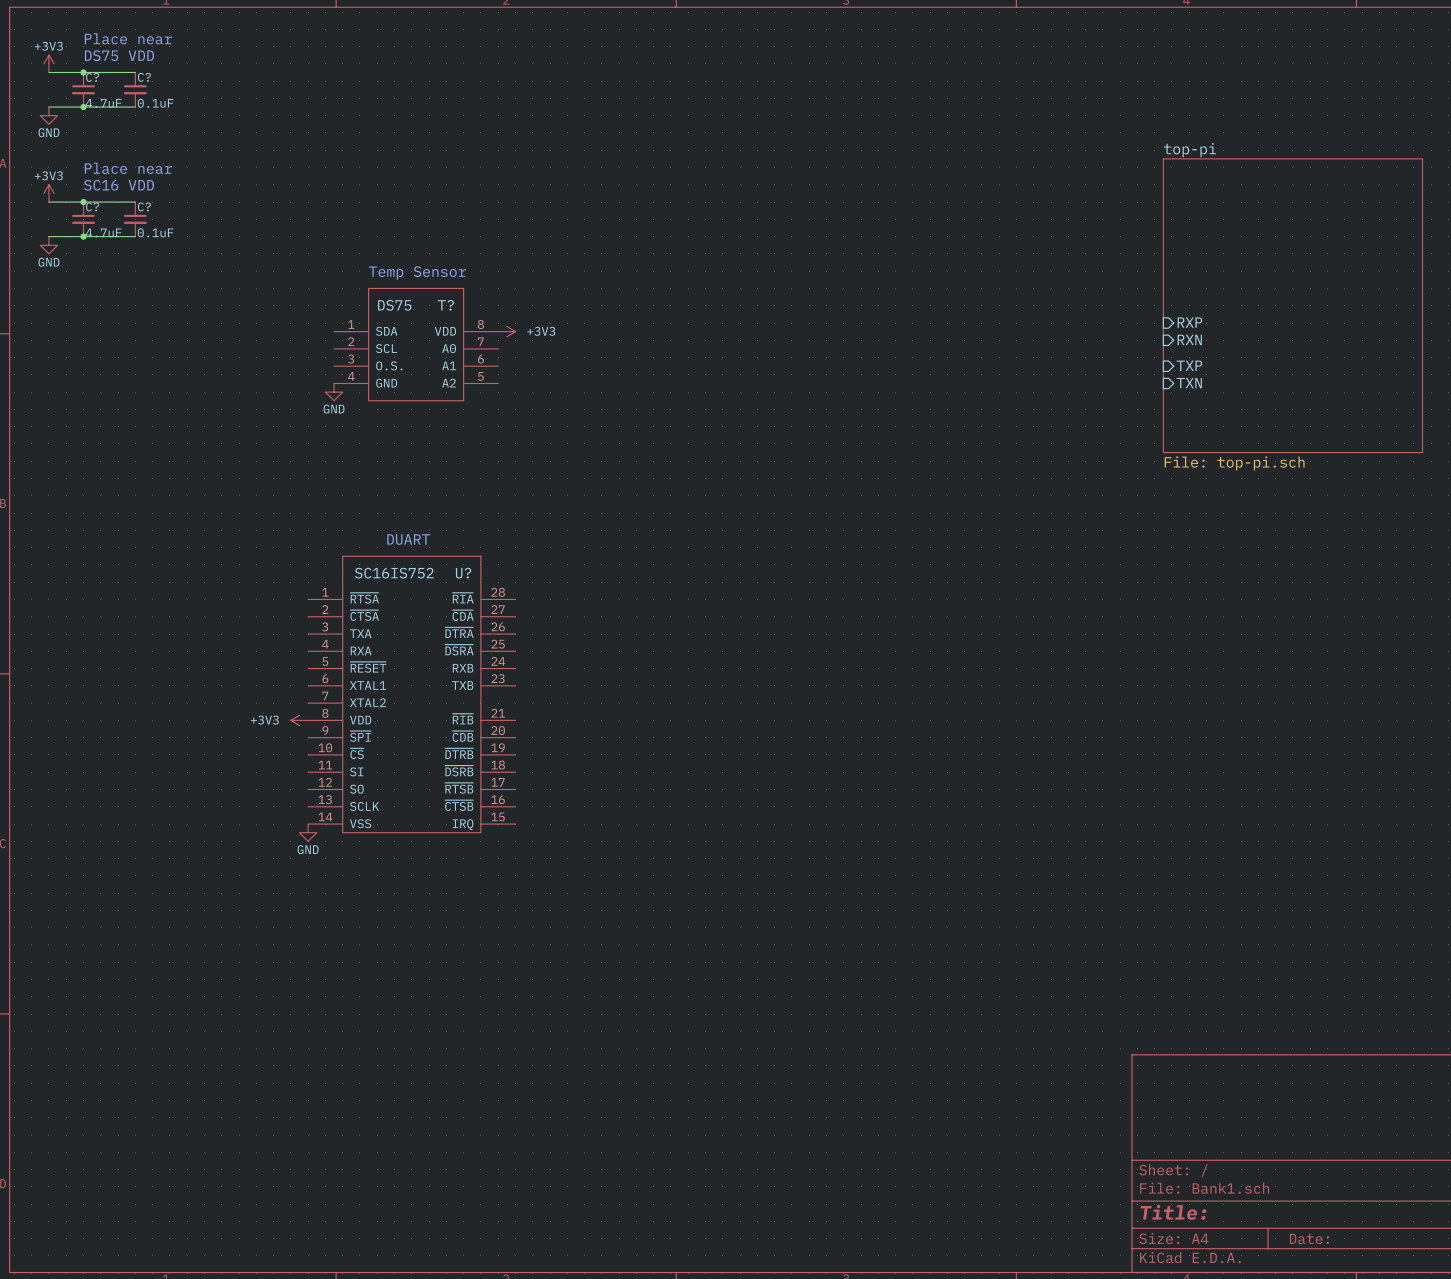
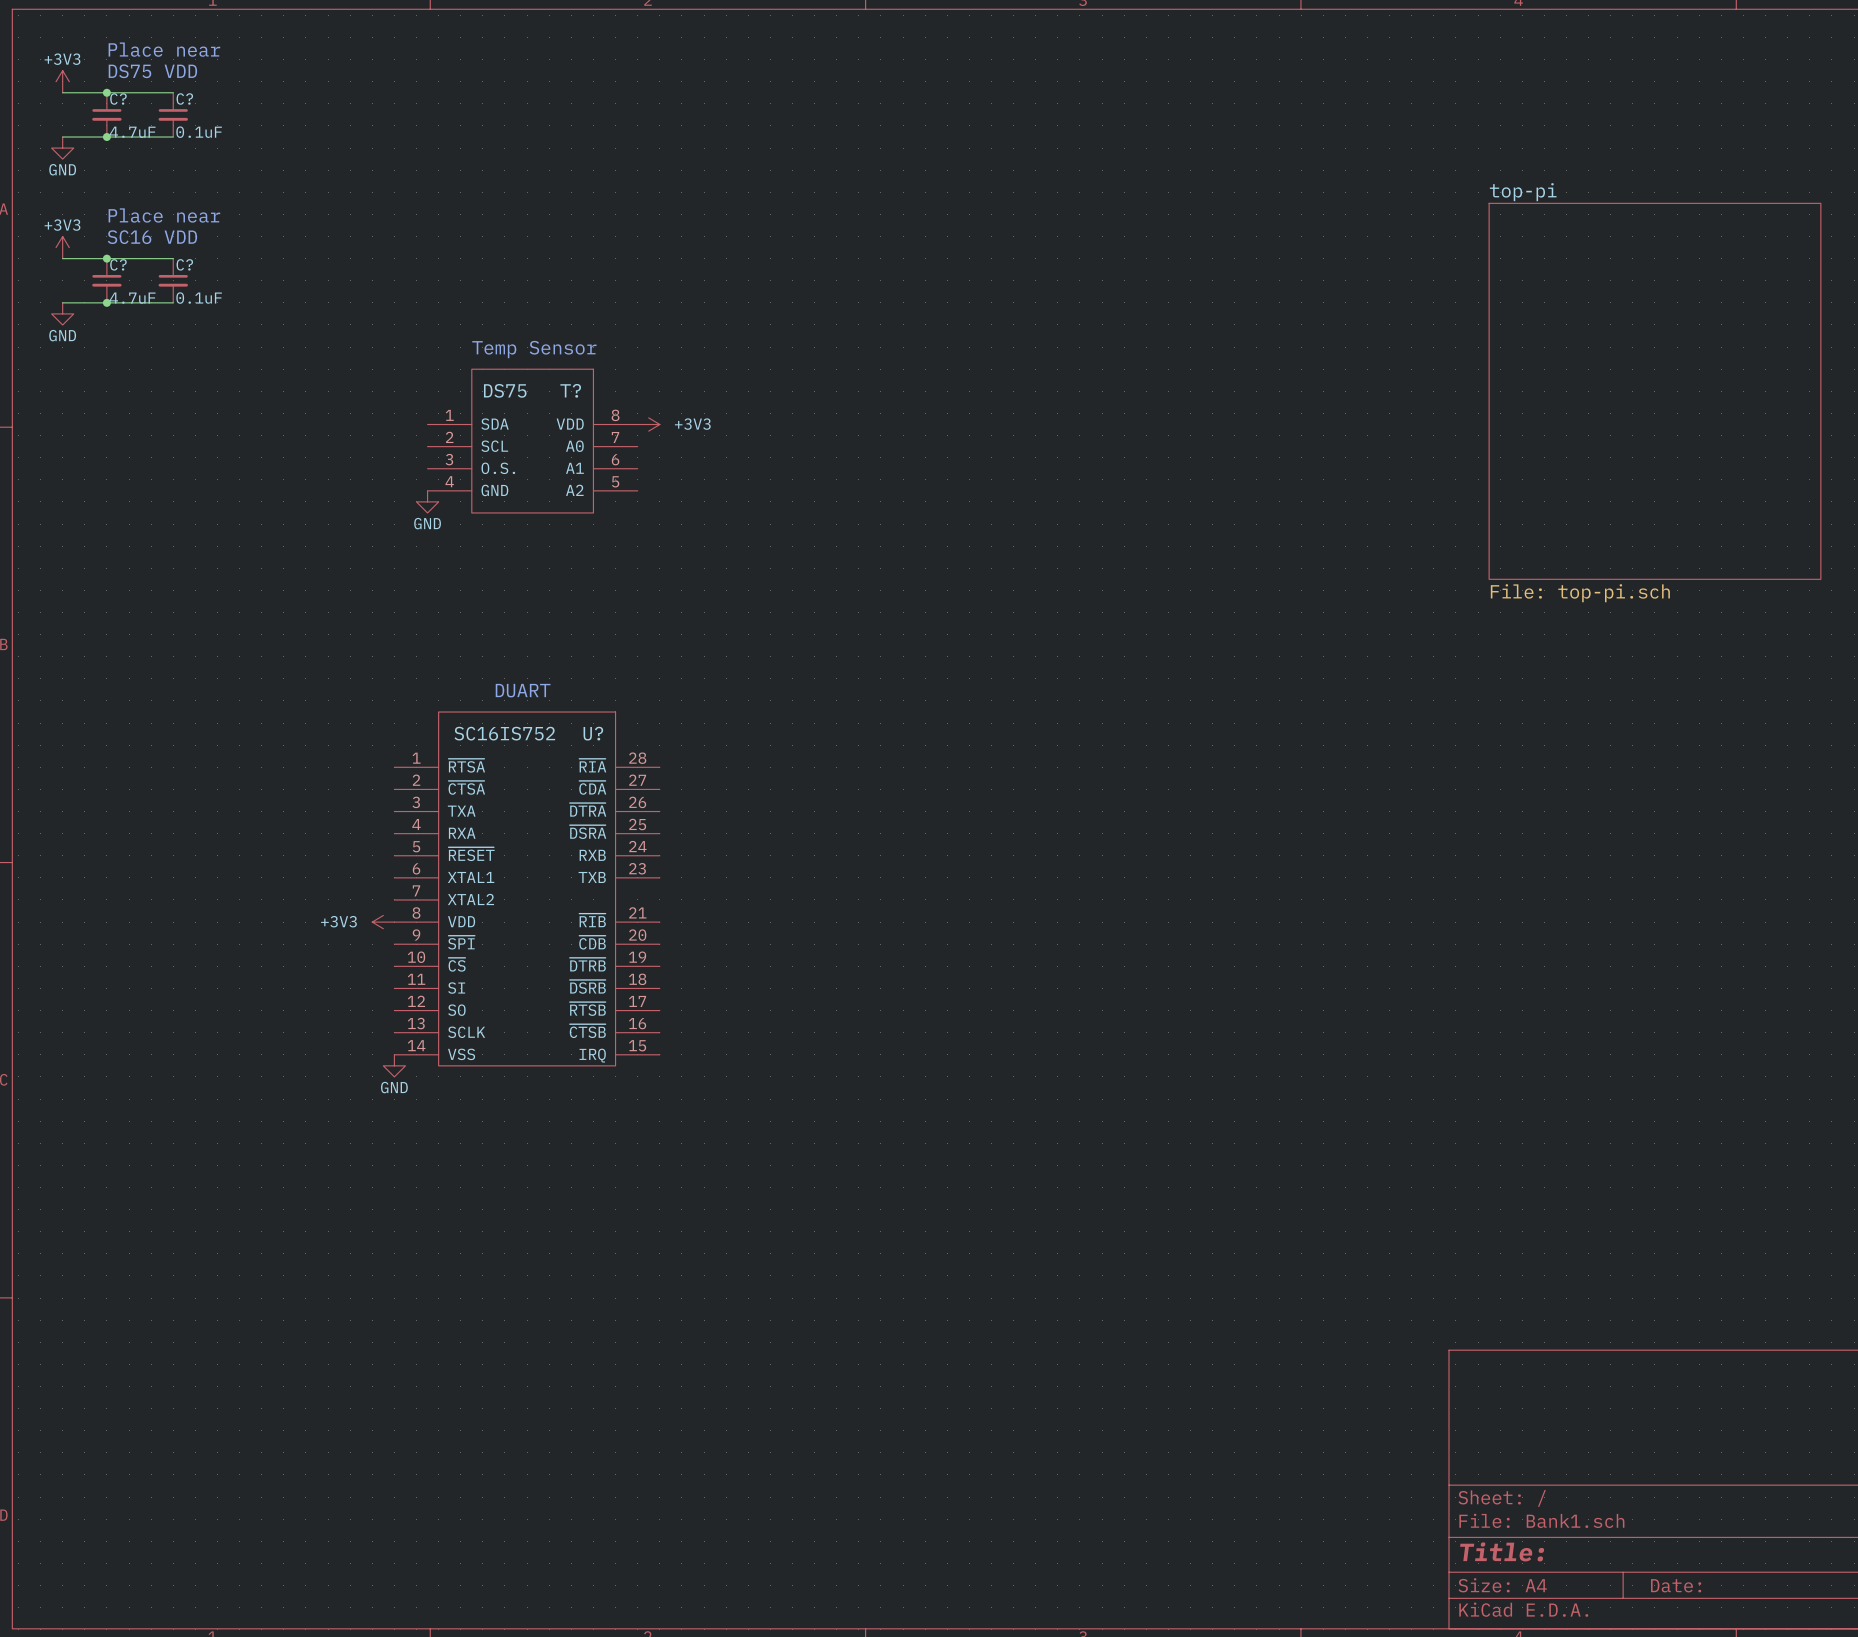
sheet pin: RXP (1189, 322) -> none
sheet pin: RXN (1189, 339) -> none
sheet pin: TXP (1189, 365) -> none
sheet pin: TXN (1189, 383) -> none

